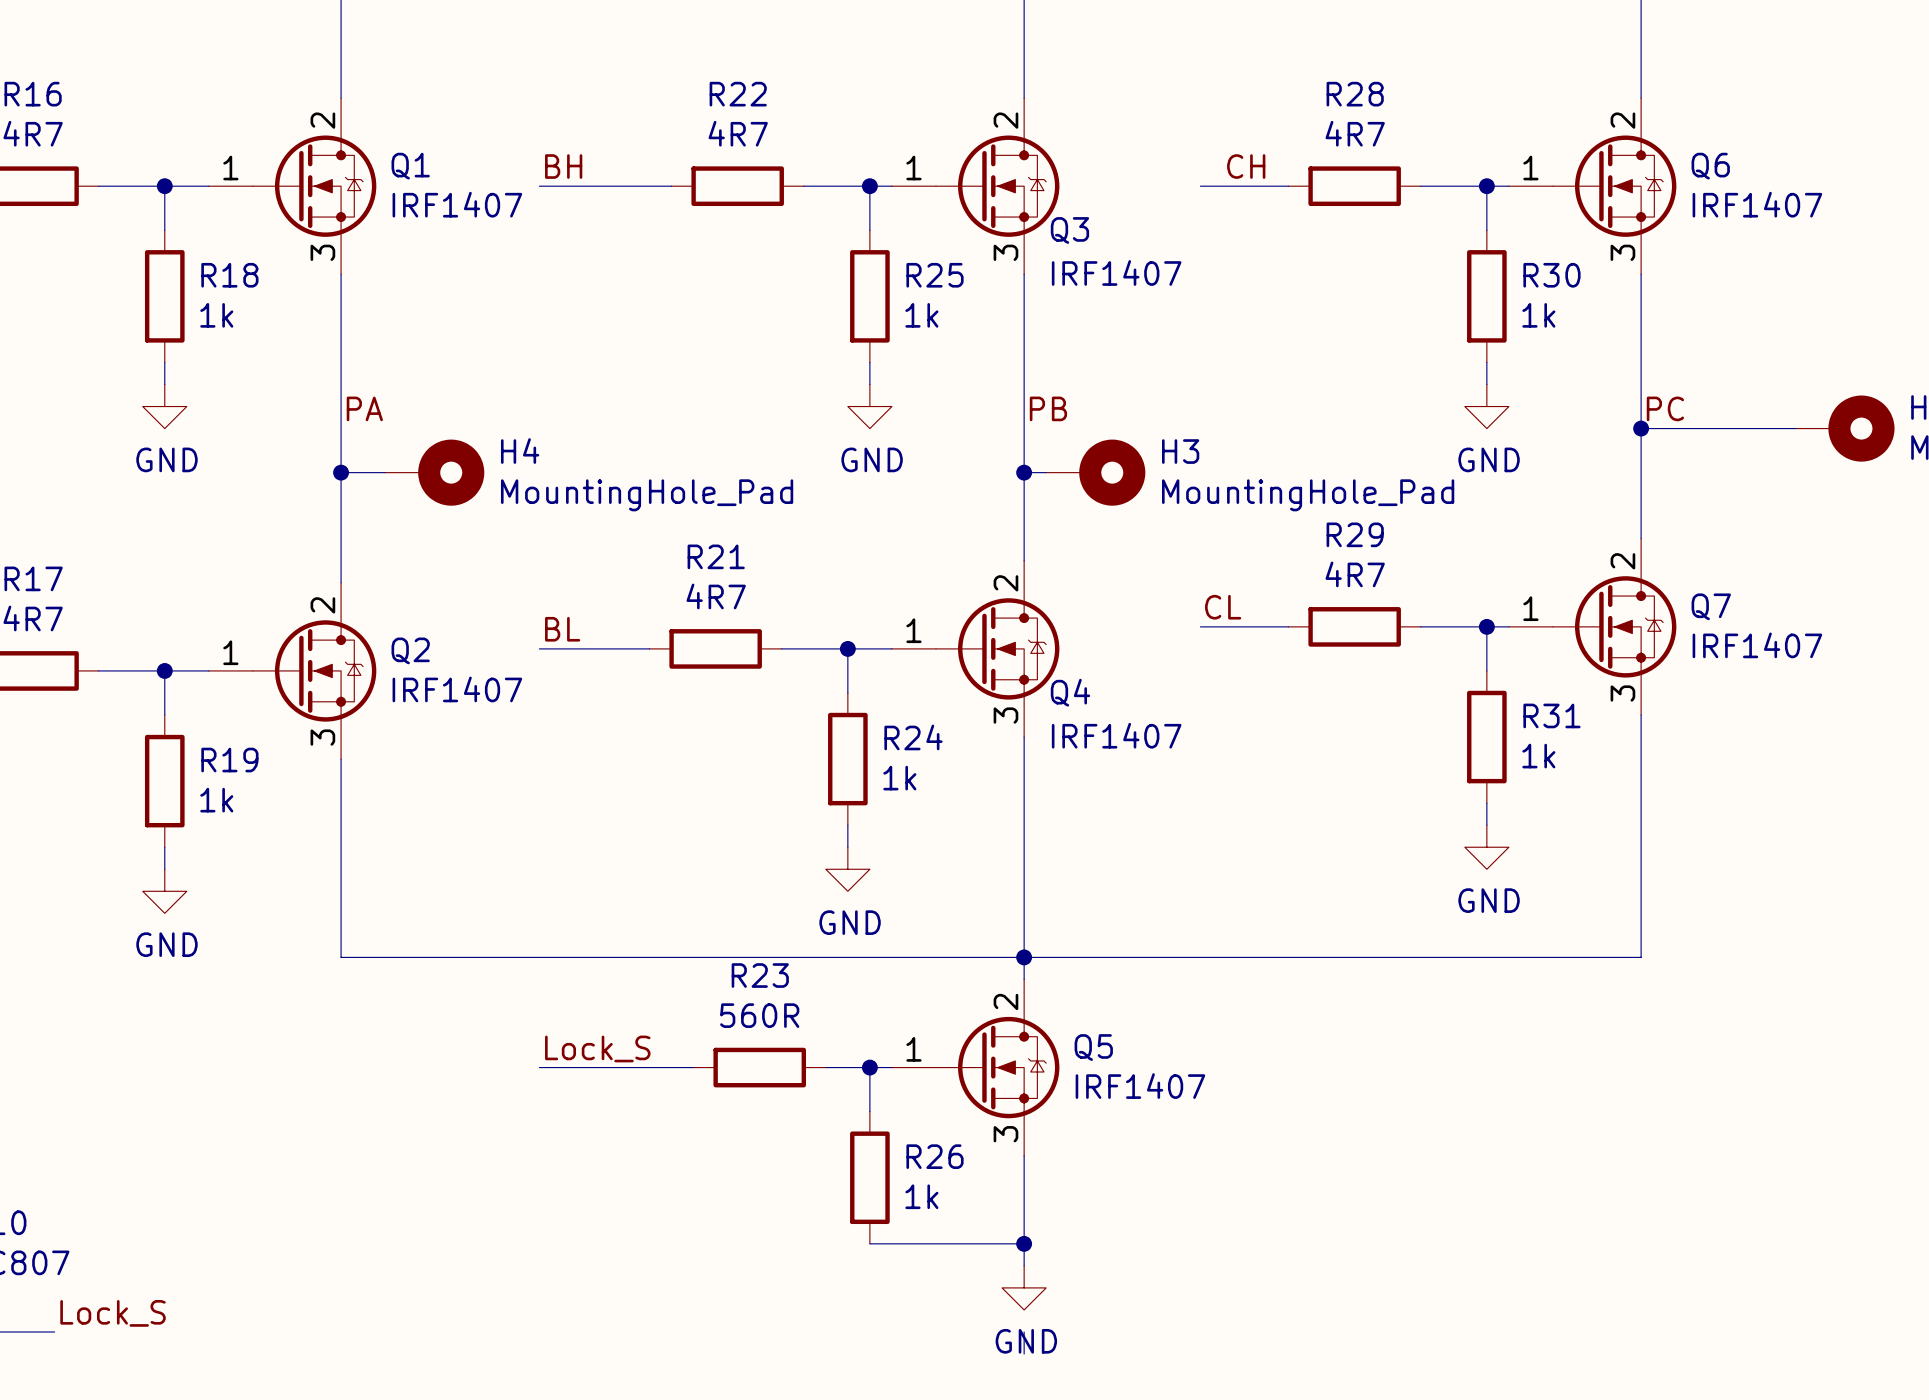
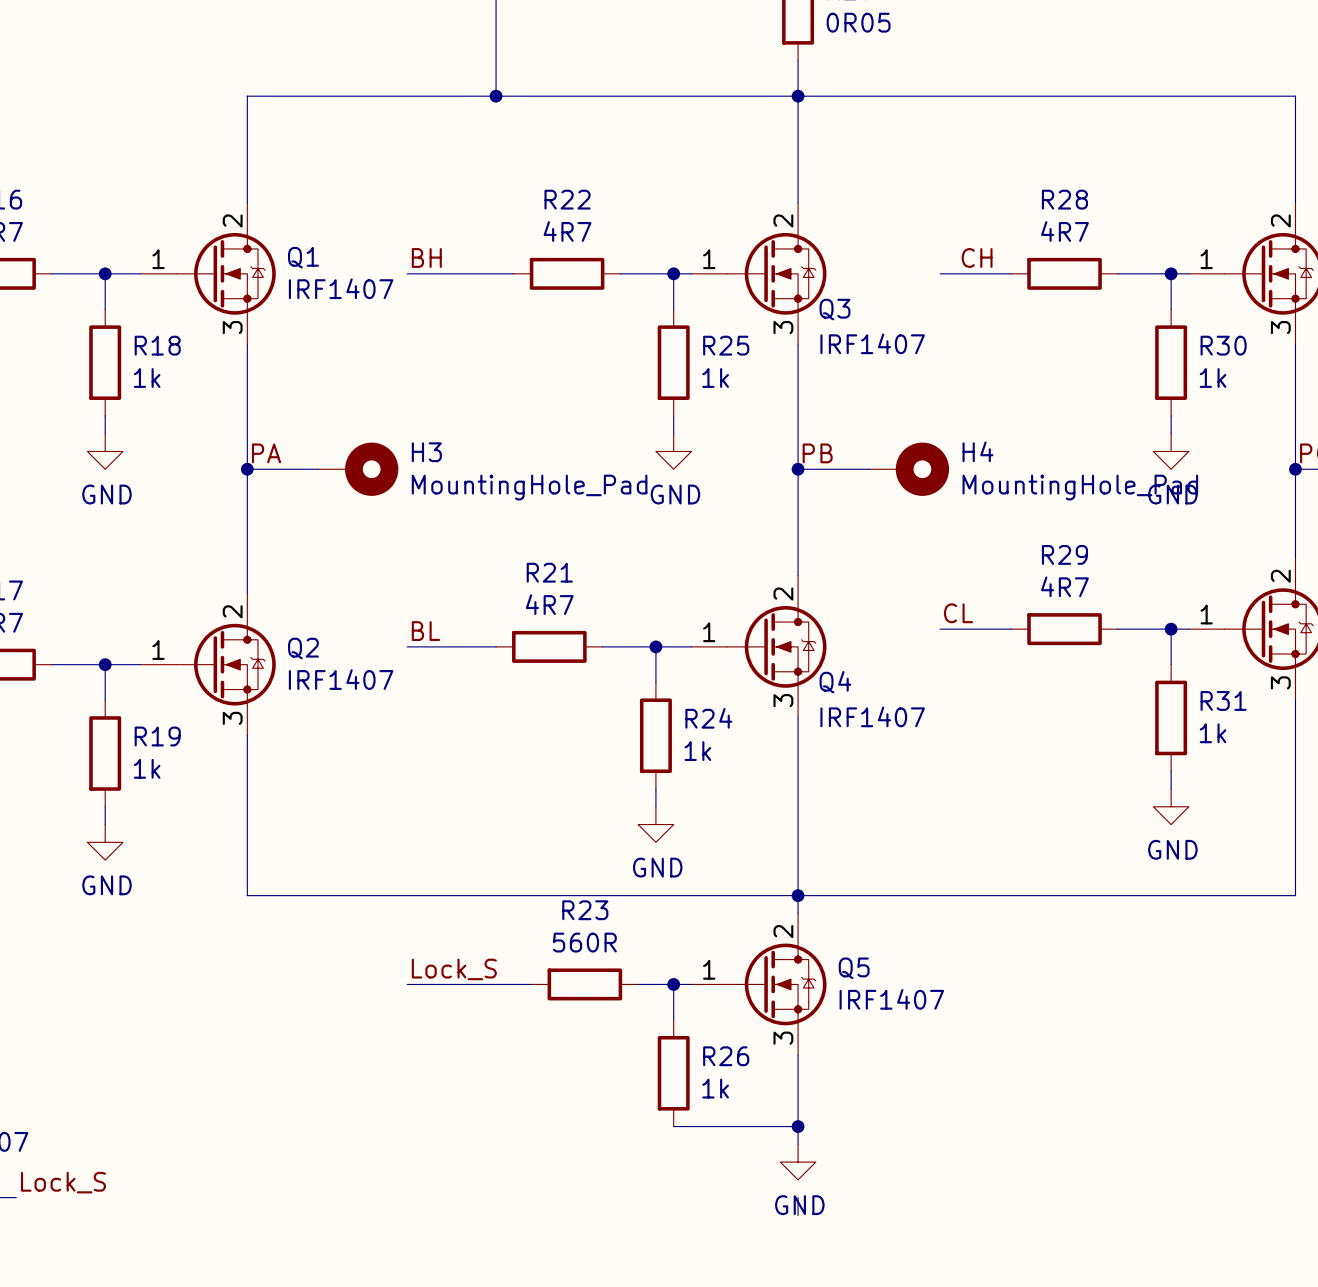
wire: none -> (247, 469) (318, 469)
wire: none -> (798, 469) (869, 469)
wire: (341, 472) (385, 472) -> none
junction position: (341, 472) -> (247, 469)
H4 position: (434, 472) -> (909, 469)
wire: (1024, 472) (1046, 472) -> none
junction position: (1024, 472) -> (798, 469)
H3 position: (1095, 472) -> (358, 469)

